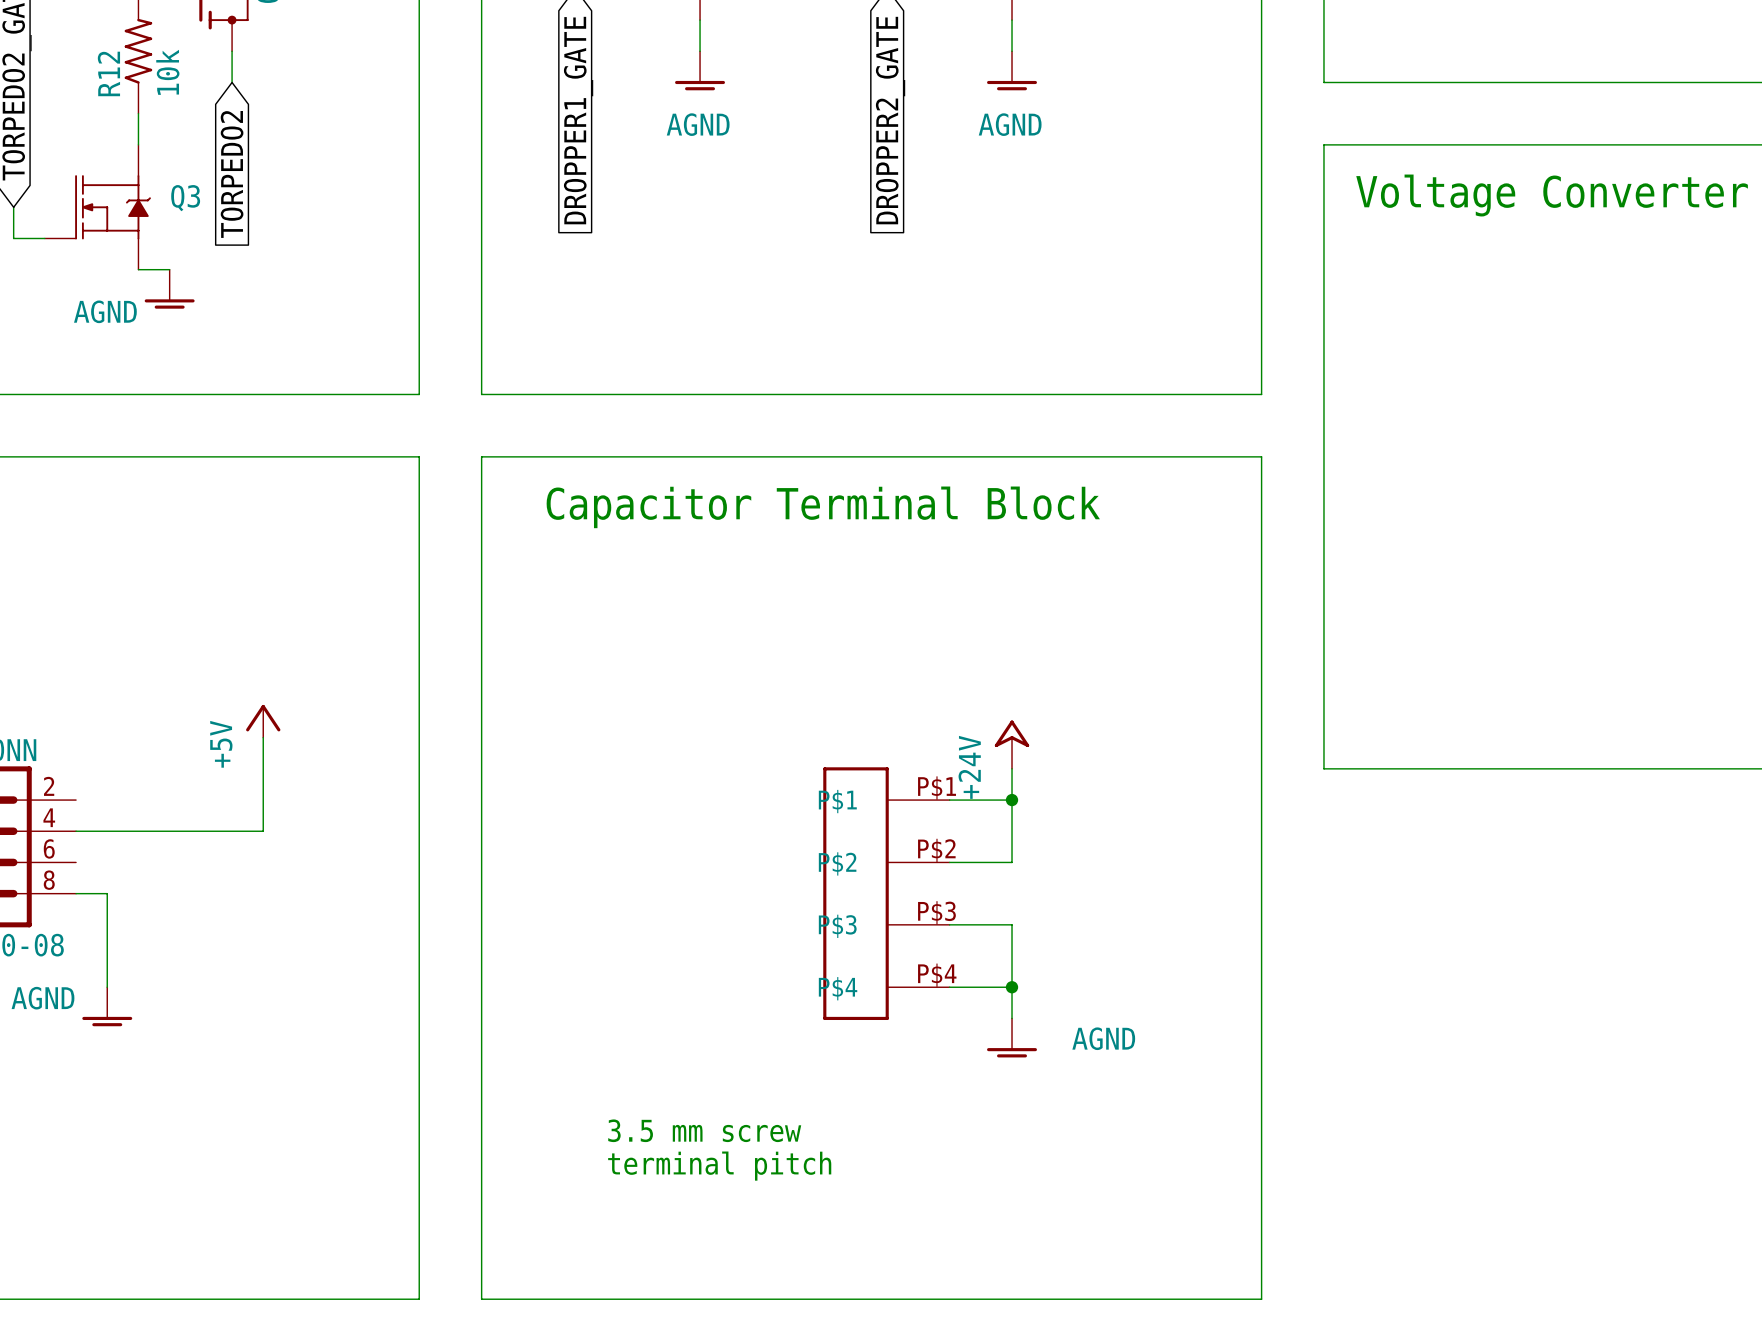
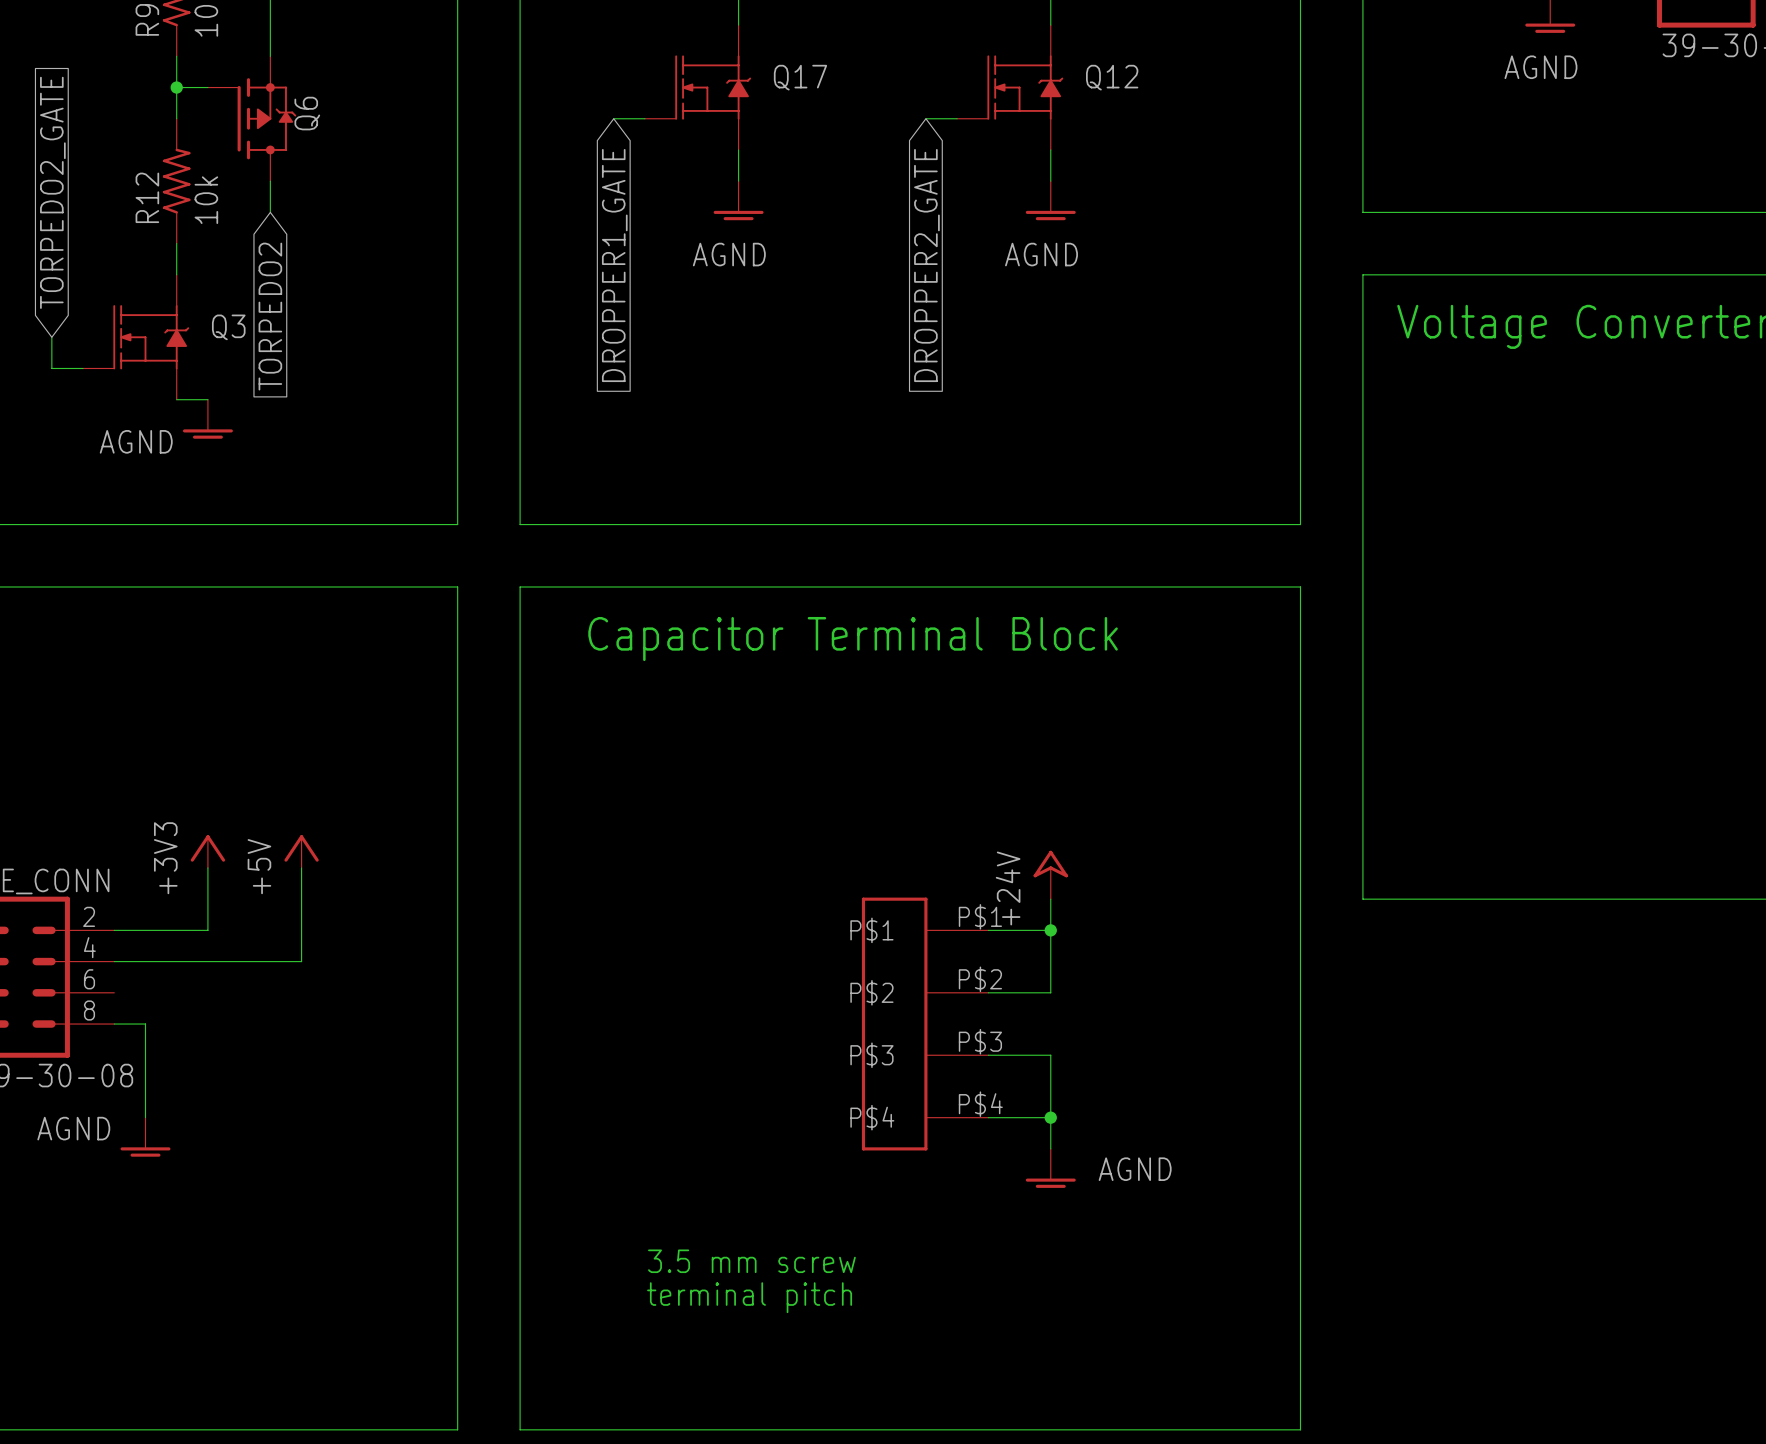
power symbol: none -> +3V3 (207, 851)
wire: none -> (207, 867) (207, 930) (114, 930)

